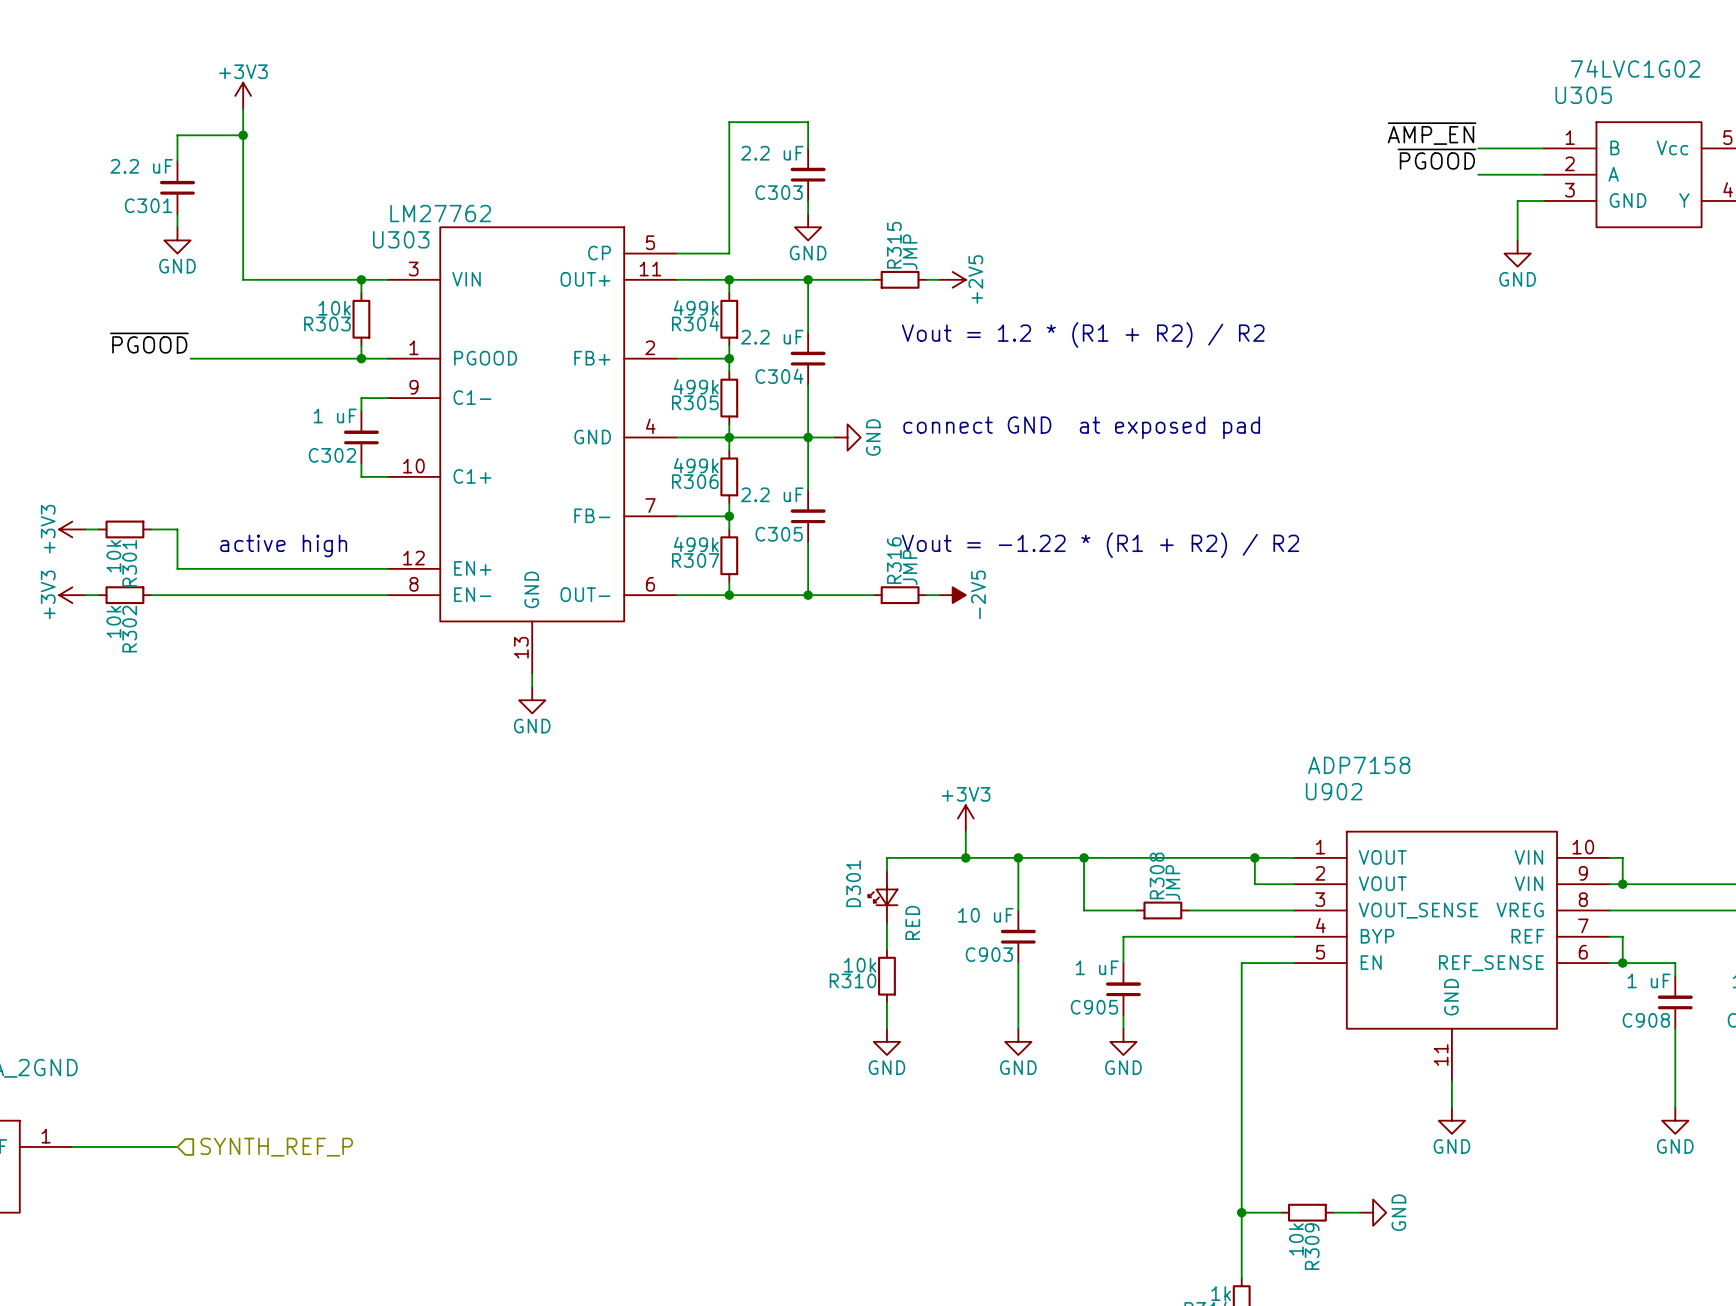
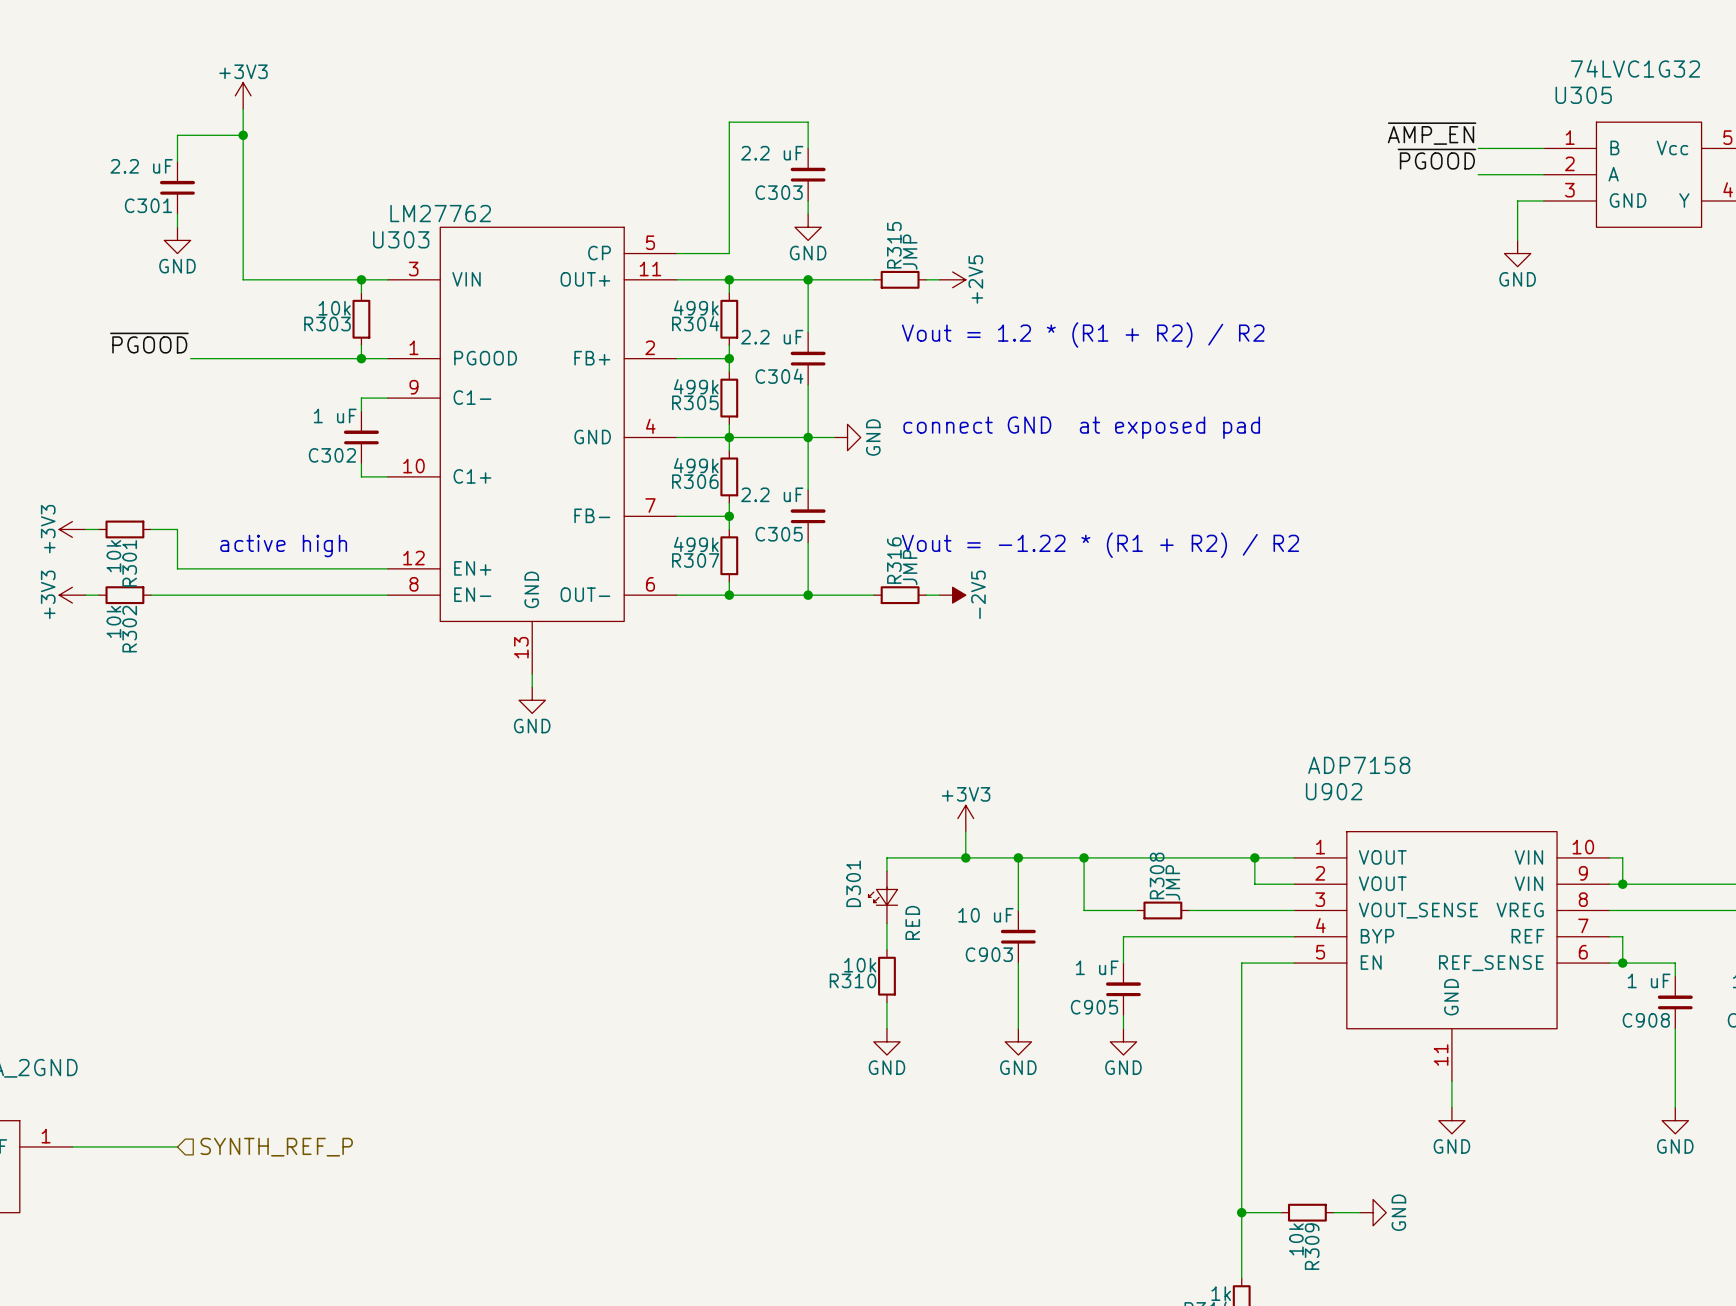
U305 value: 74LVC1G02 (1635, 68) -> 74LVC1G32 (1635, 68)

